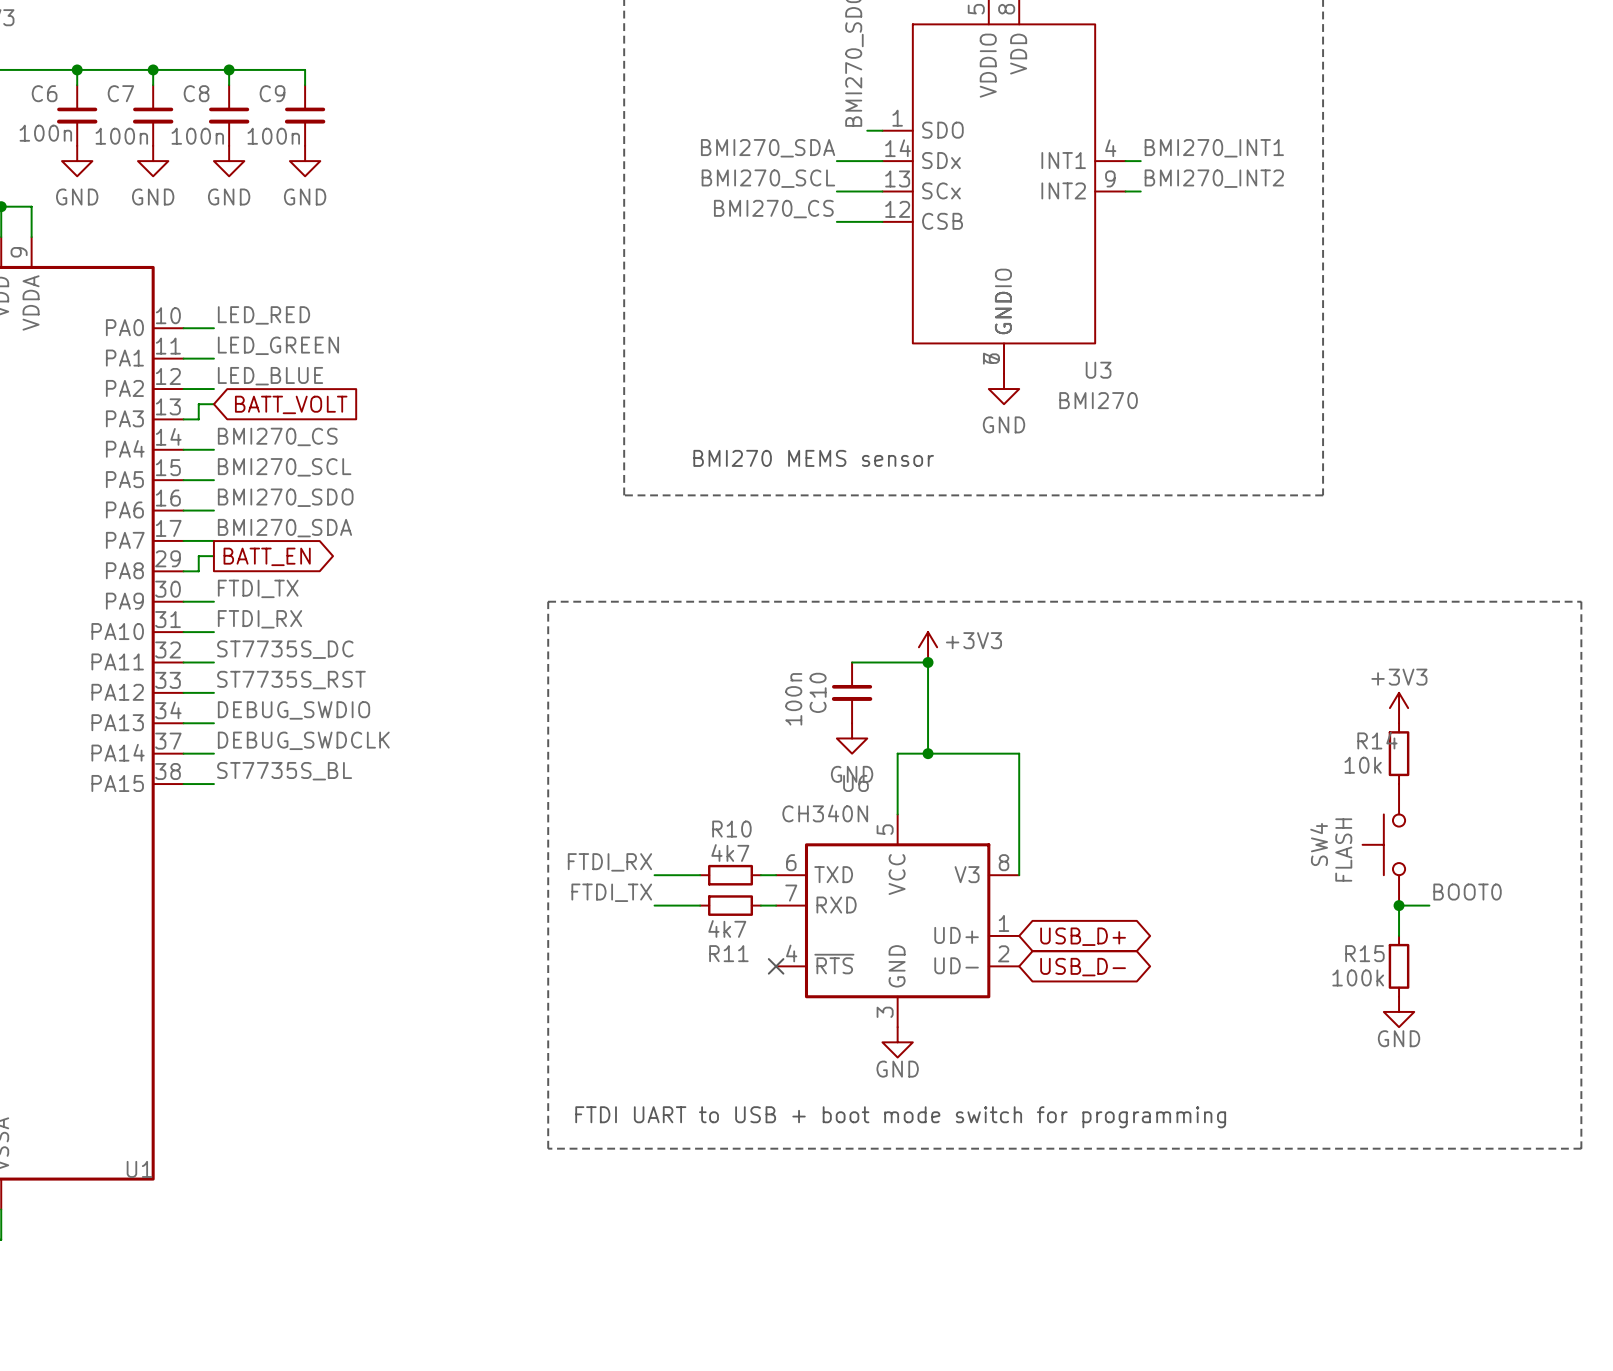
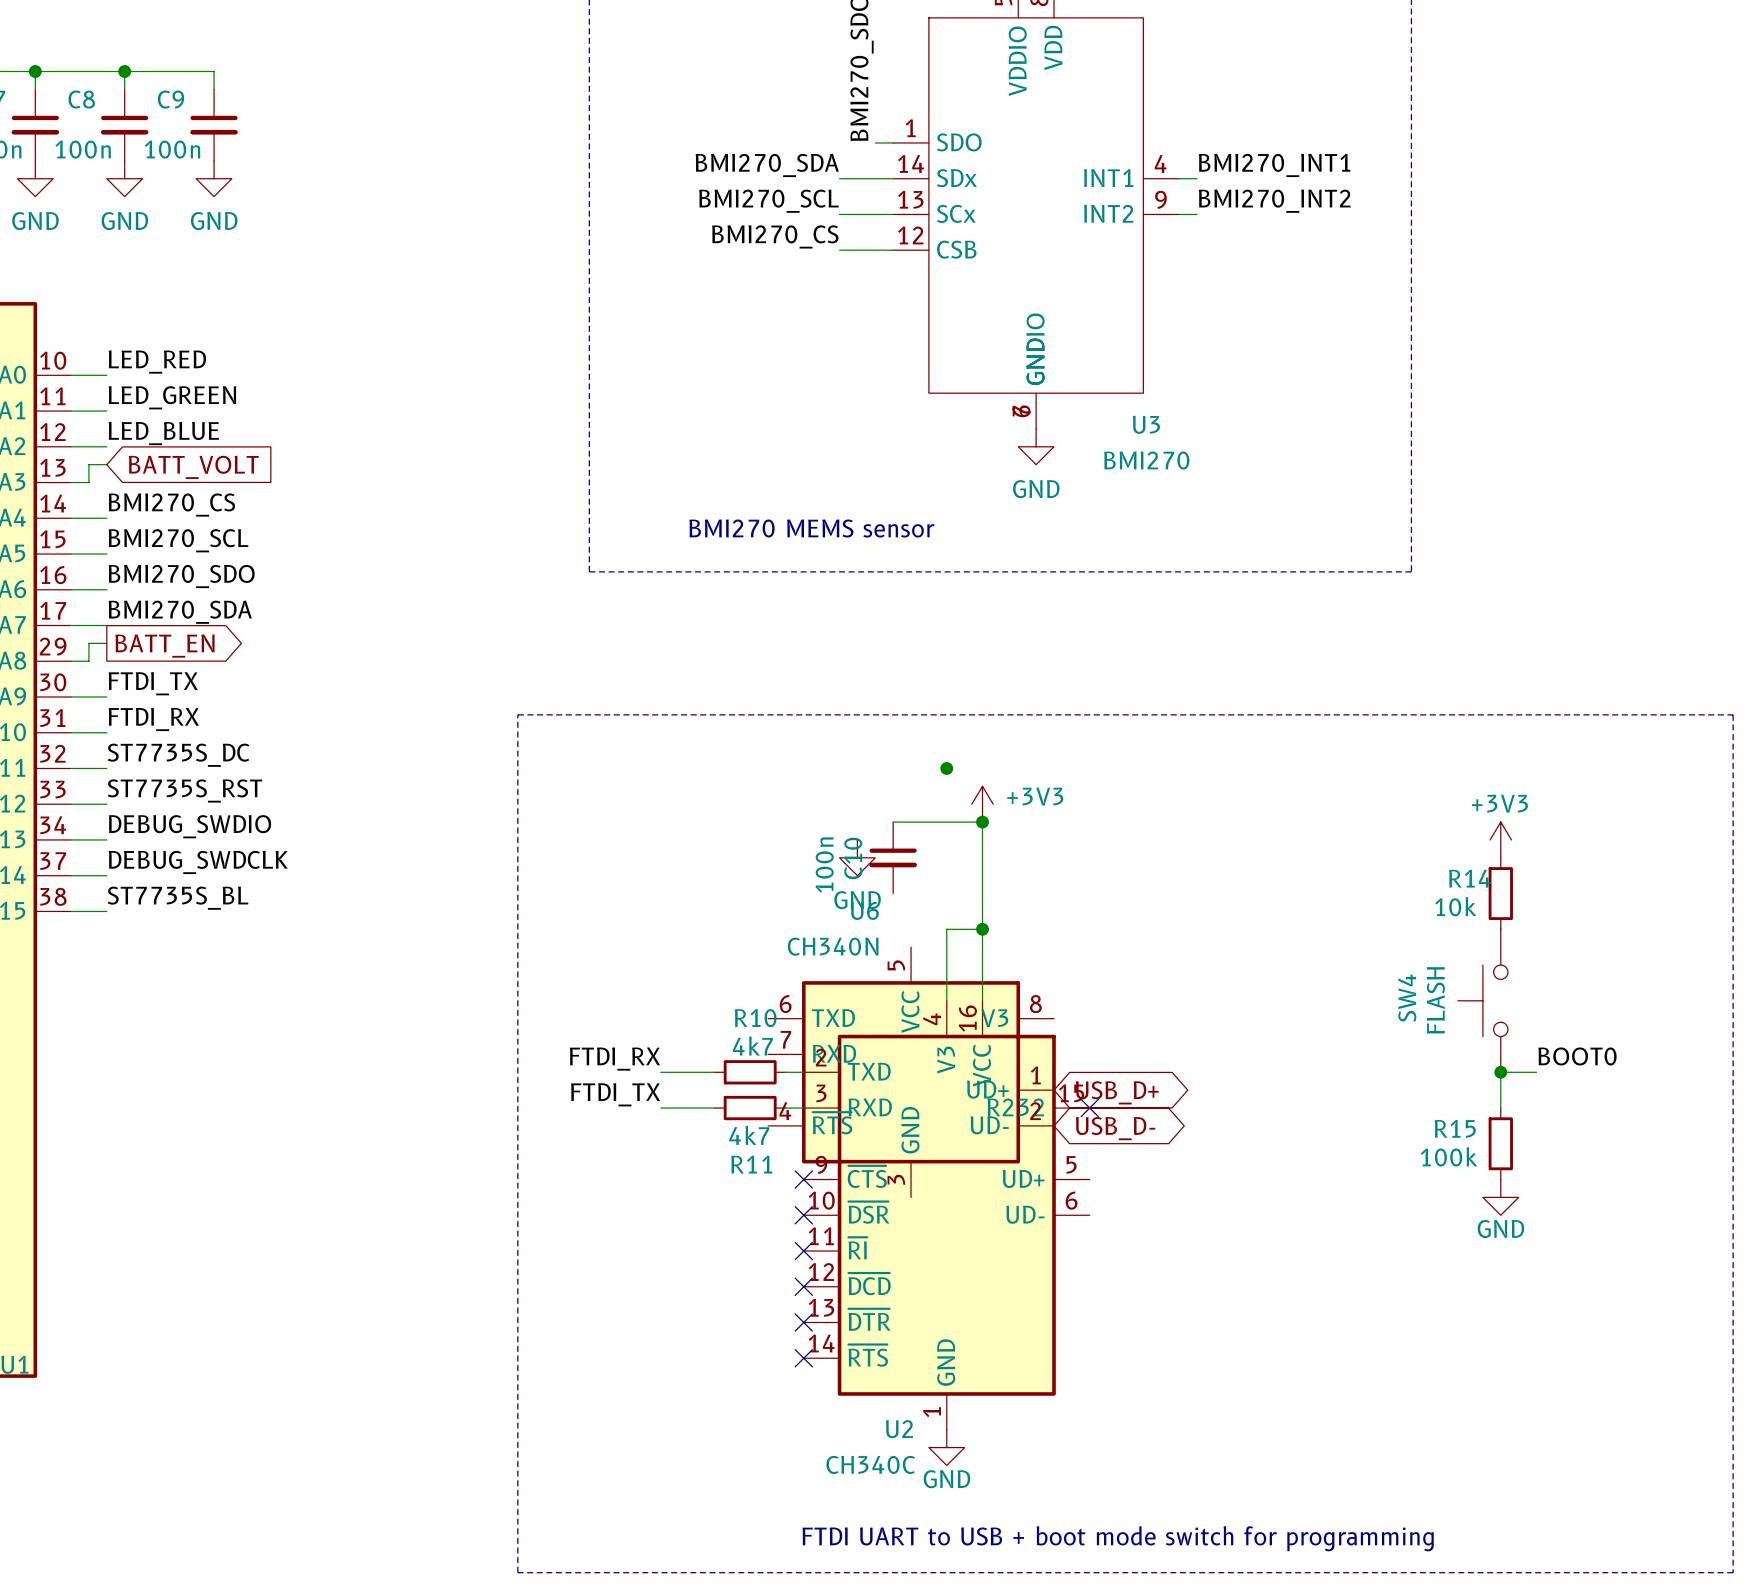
line: (548, 601) (1581, 601) (1581, 1148) (548, 1148) (548, 601) -> (517, 714) (517, 1572) (1733, 1572) (1733, 714) (517, 714)
power symbol position: +3V3 (928, 647) -> +3V3 (982, 804)
wire: (852, 662) (928, 662) (928, 753) -> none
C10 position: (852, 692) -> (893, 857)
wire: none -> (893, 822) (982, 822) (982, 1000)
junction: none -> (982, 822)
power symbol position: +3V3 (1399, 708) -> +3V3 (1500, 839)
junction: (928, 753) -> none
R14 position: (1399, 753) -> (1500, 893)
wire: none -> (982, 929) (946, 929) (946, 1000)
junction: none -> (982, 929)
wire: (897, 814) (897, 753) (1019, 753) (1019, 875) -> none
SW4 position: (1383, 844) -> (1482, 1000)
label position: FTDI_RX (609, 862) -> FTDI_RX (614, 1059)
wire: (654, 875) (700, 875) -> (660, 1072) (714, 1072)
R10 position: (730, 875) -> (750, 1072)
wire: (760, 875) (776, 875) -> (785, 1072) (803, 1072)
label position: FTDI_TX (611, 892) -> FTDI_TX (615, 1094)
label position: BOOT0 (1467, 892) -> BOOT0 (1577, 1056)
wire: (654, 905) (700, 905) -> (660, 1108) (714, 1108)
R11 position: (730, 905) -> (750, 1108)
wire: (760, 905) (776, 905) -> (785, 1108) (803, 1108)
junction position: (1399, 905) -> (1500, 1072)
wire: (1429, 905) (1399, 905) (1399, 920) -> (1536, 1072) (1500, 1072)
no-connect mark: none -> (1089, 1108)
no-connect mark: (776, 966) -> none
R15 position: (1399, 966) -> (1500, 1143)
no-connect mark: none -> (803, 1179)
power symbol position: GND (1399, 1011) -> GND (1500, 1197)
no-connect mark: none -> (803, 1215)
power symbol position: GND (897, 1042) -> GND (946, 1447)
U2: none -> CH340C (946, 1215)
no-connect mark: none -> (803, 1251)
no-connect mark: none -> (803, 1286)
text position: FTDI UART to USB + boot mode switch for programming (900, 1117) -> FTDI UART to USB + boot mode switch for programming (1118, 1538)
no-connect mark: none -> (803, 1322)
no-connect mark: none -> (803, 1358)

